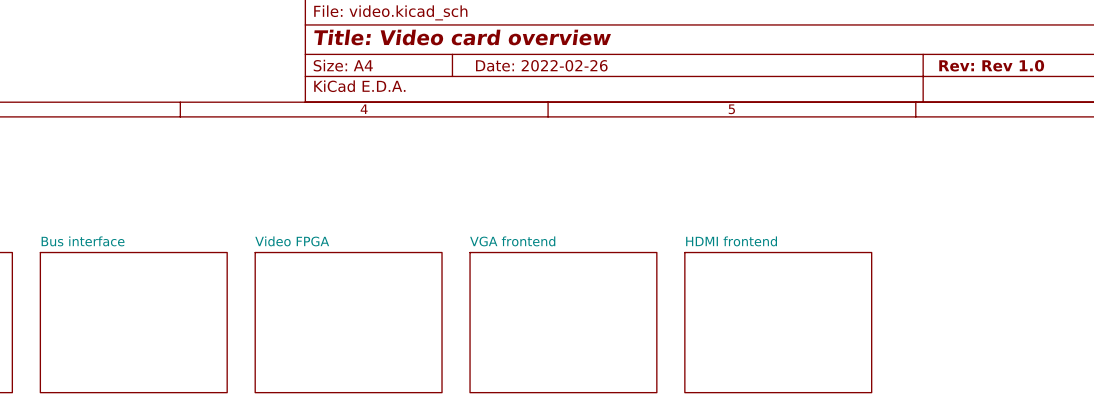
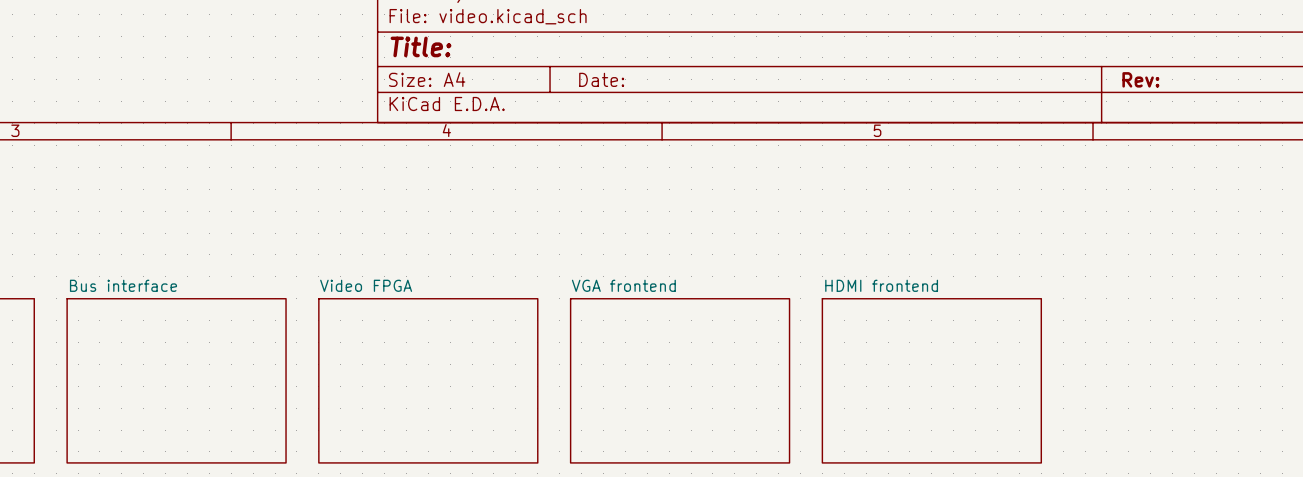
title block: Title: Video card overview (462, 37) -> Title: (421, 46)
title block: Date: 2022-02-26 (541, 65) -> Date: (601, 79)
title block: Rev: Rev 1.0 (991, 65) -> Rev: (1140, 79)

